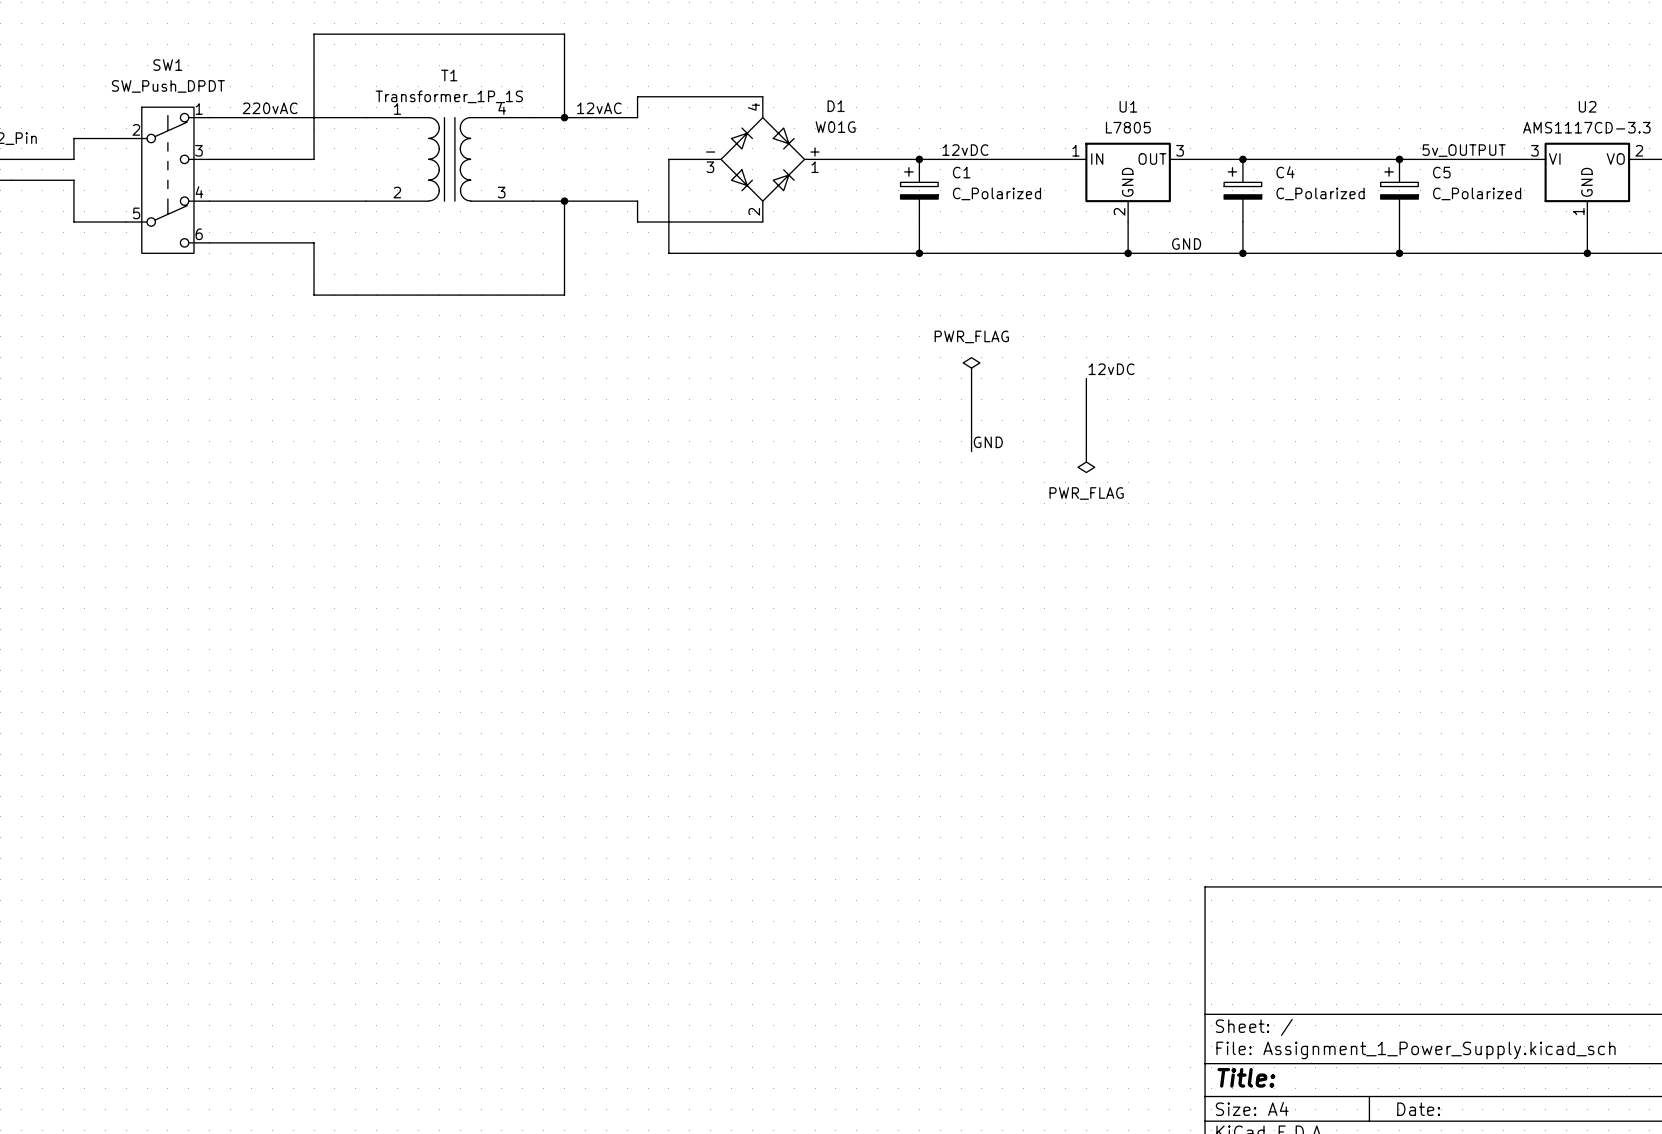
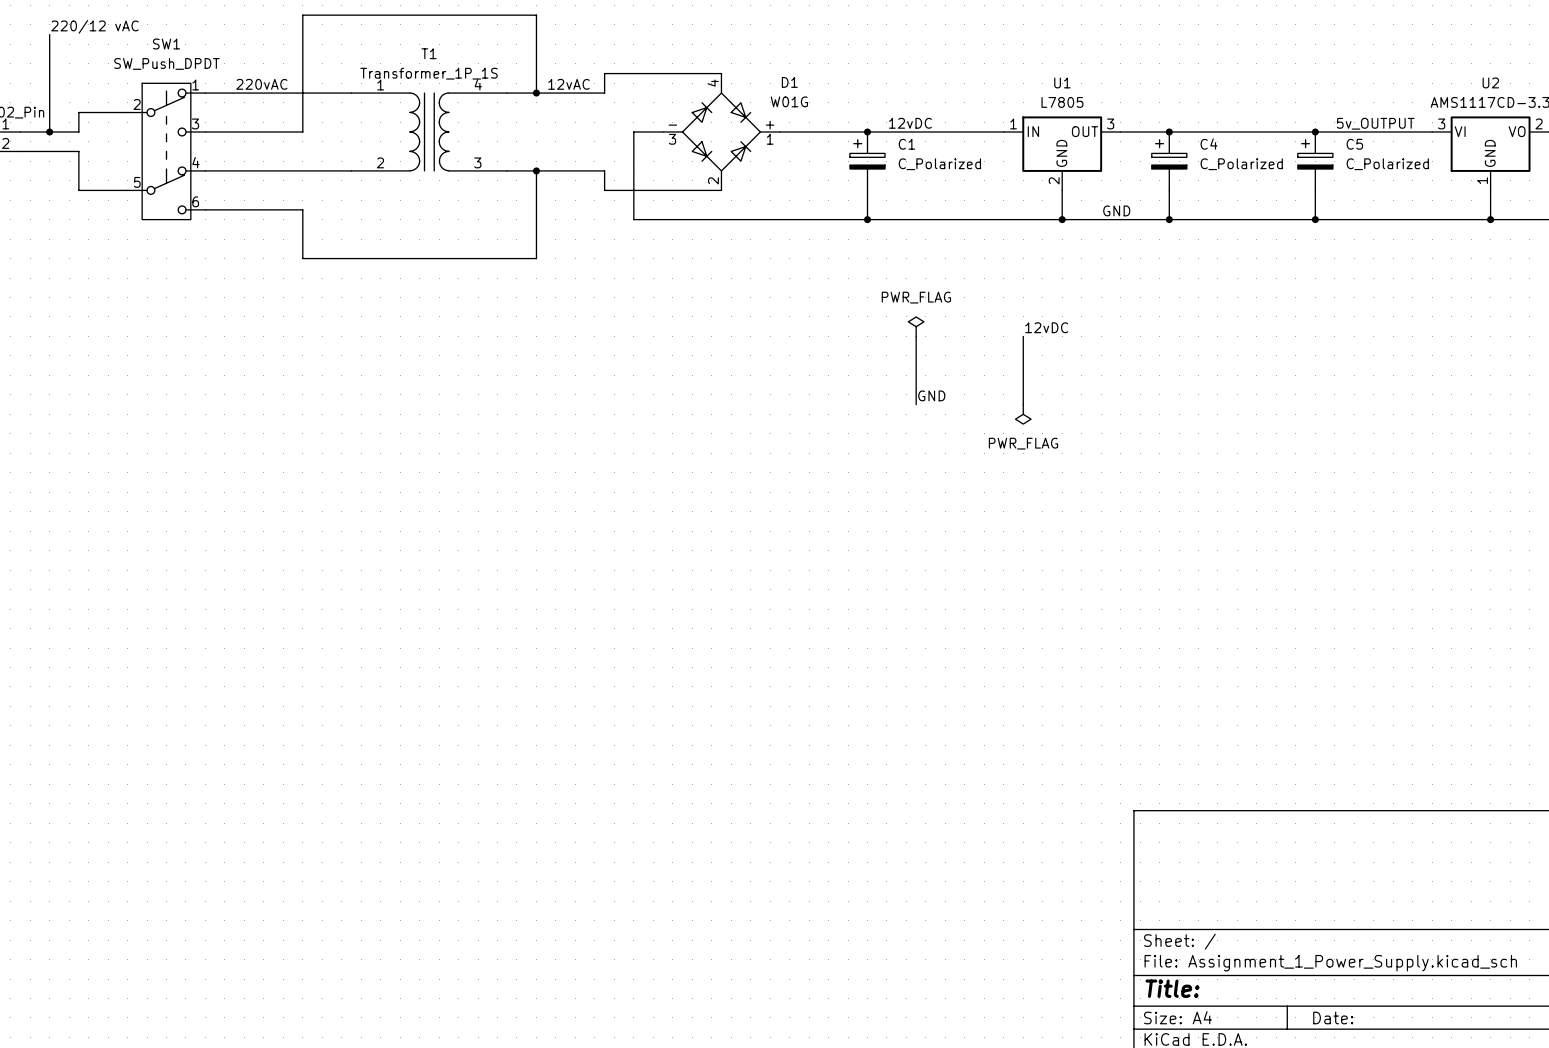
label: none -> 220/12 vAC (94, 26)
wire: none -> (49, 34) (49, 131)
junction: none -> (49, 131)

